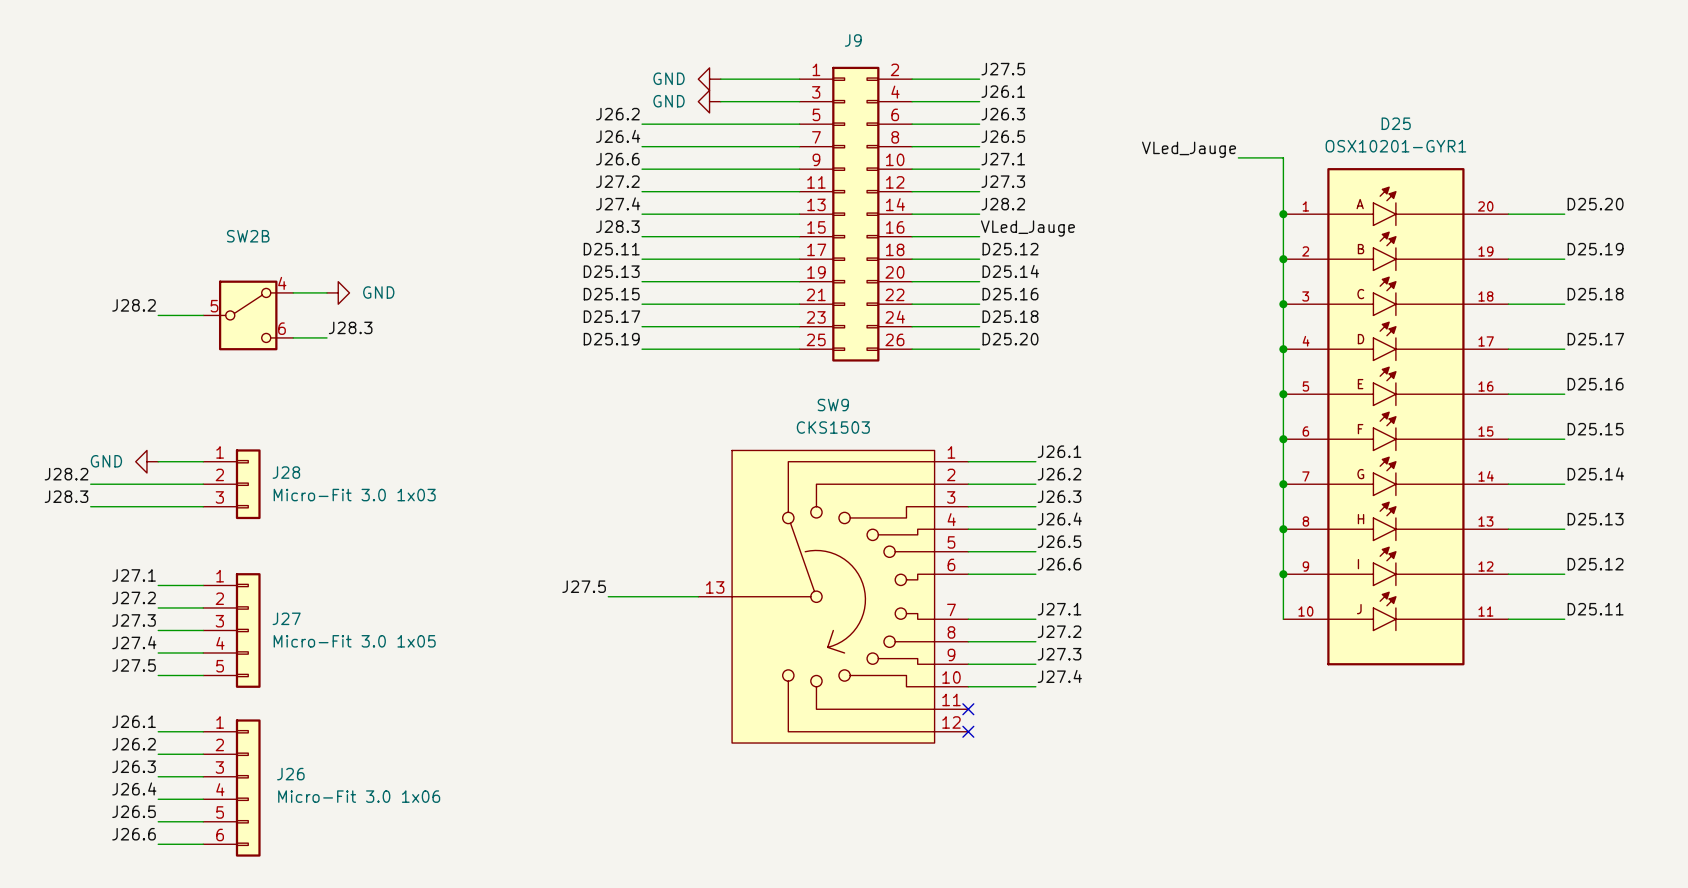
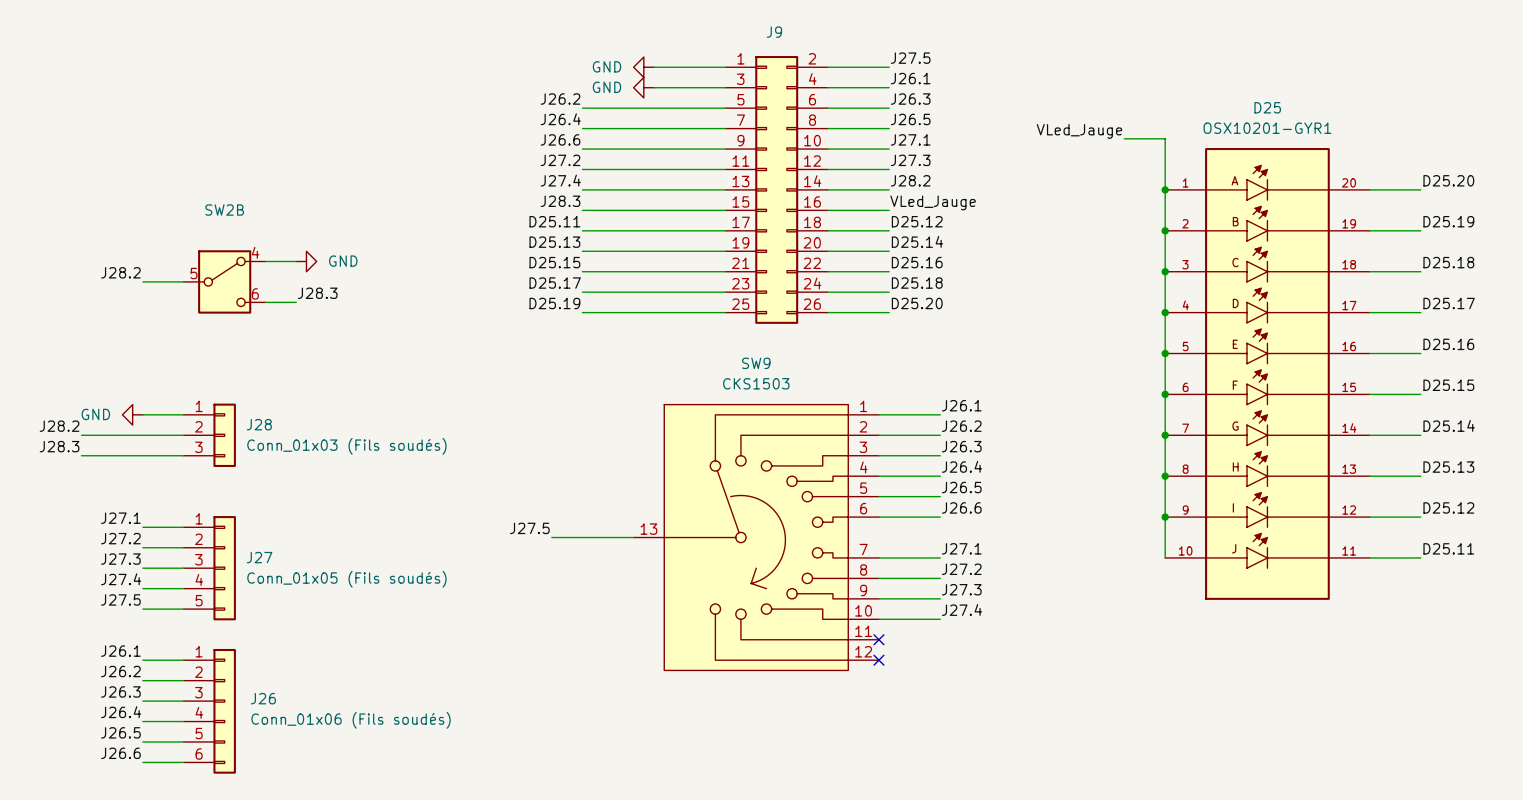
J28 value: Micro-Fit 3.0 1x03 (354, 495) -> Conn_01x03 (Fils soudés) (346, 446)
J27 value: Micro-Fit 3.0 1x05 (354, 641) -> Conn_01x05 (Fils soudés) (346, 579)
J26 value: Micro-Fit 3.0 1x06 (359, 796) -> Conn_01x06 (Fils soudés) (351, 720)

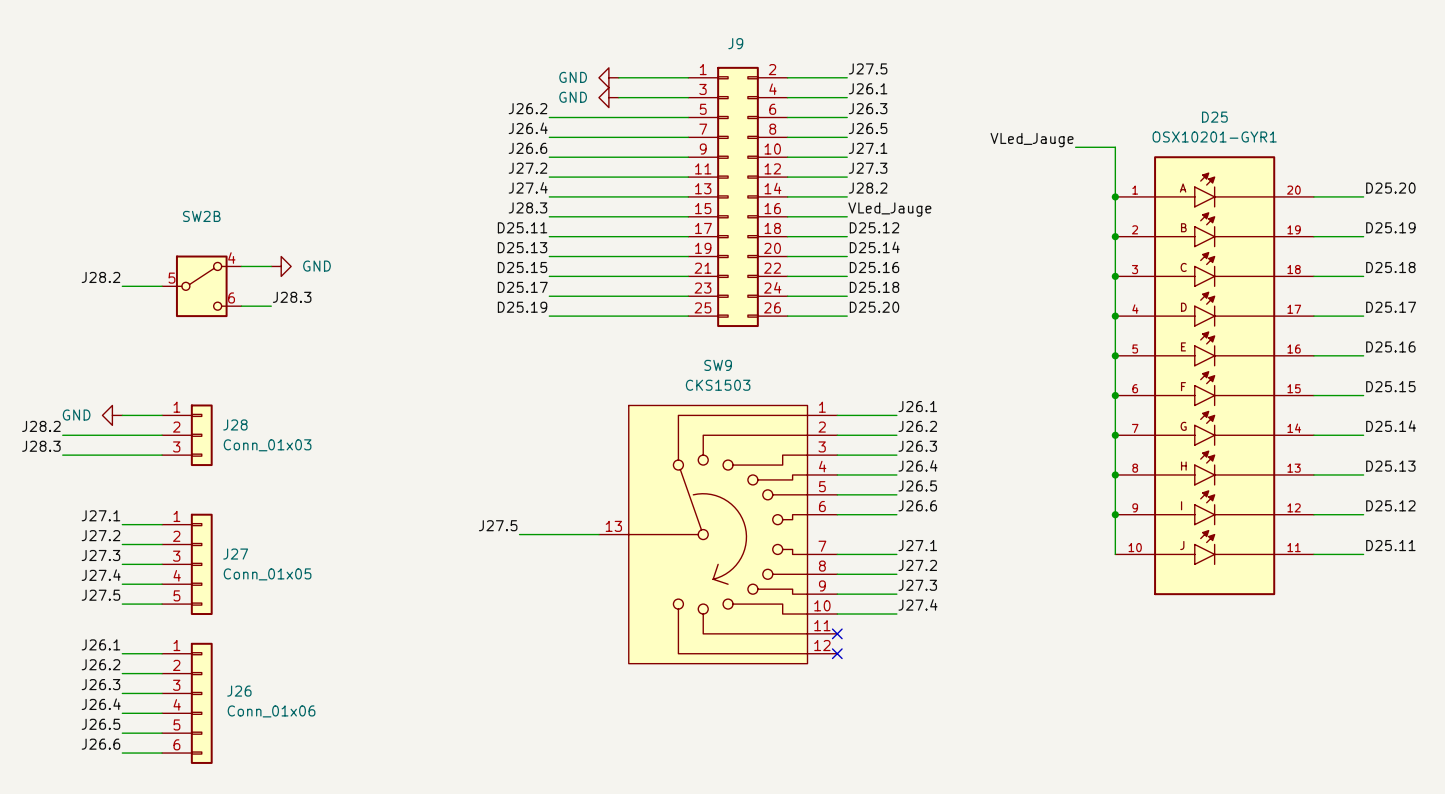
J28 value: Conn_01x03 (Fils soudés) (346, 446) -> Conn_01x03 (267, 445)
J27 value: Conn_01x05 (Fils soudés) (346, 579) -> Conn_01x05 (267, 574)
J26 value: Conn_01x06 (Fils soudés) (351, 720) -> Conn_01x06 (271, 711)

